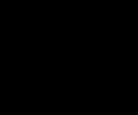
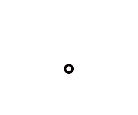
round board edge: none -> [64, 64, 74, 74]

